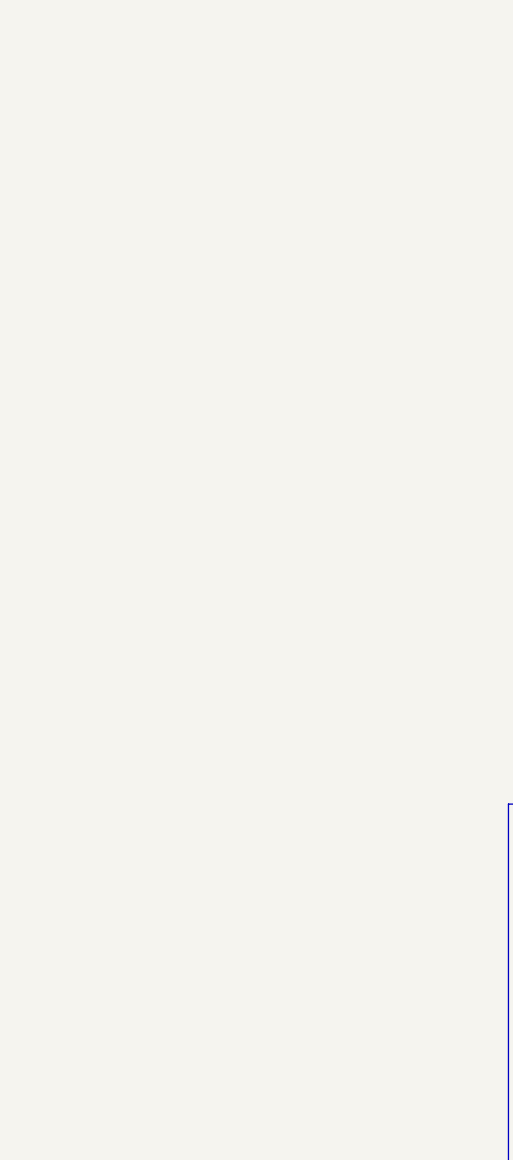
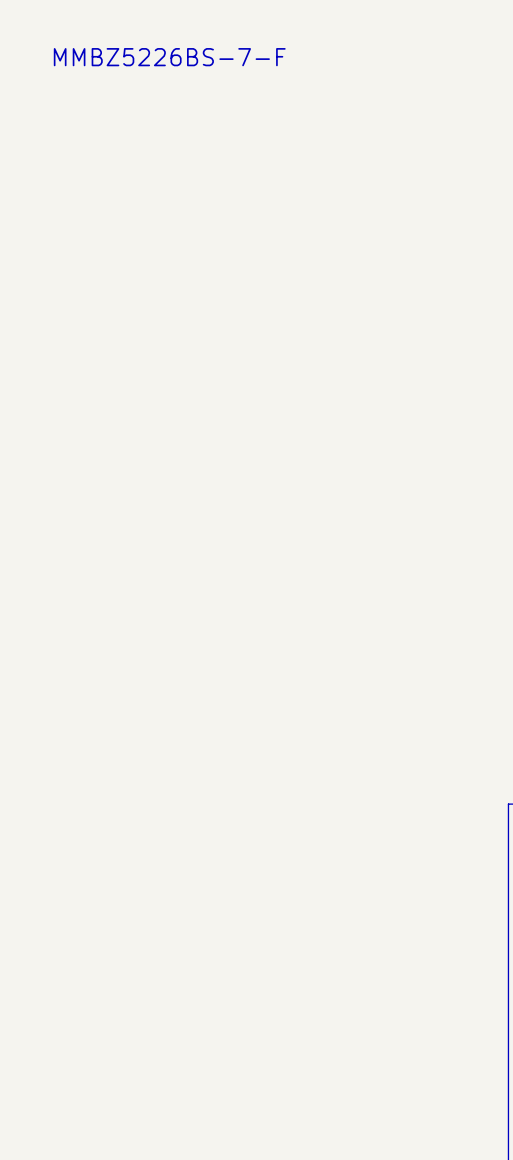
text: none -> MMBZ5226BS-7-F (169, 57)

